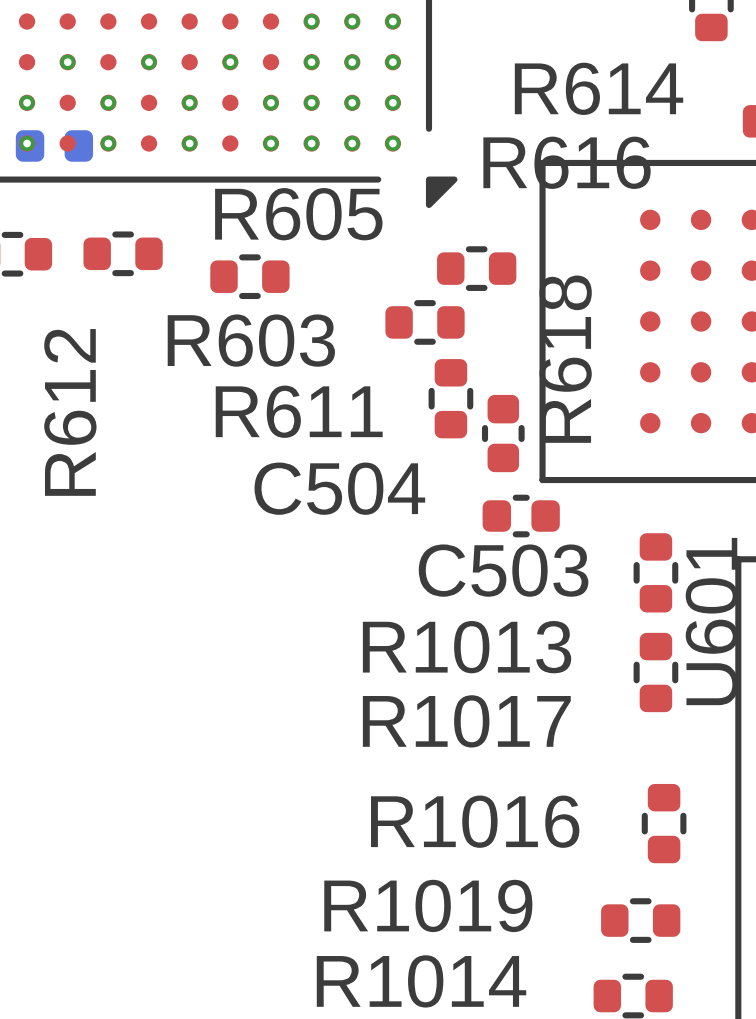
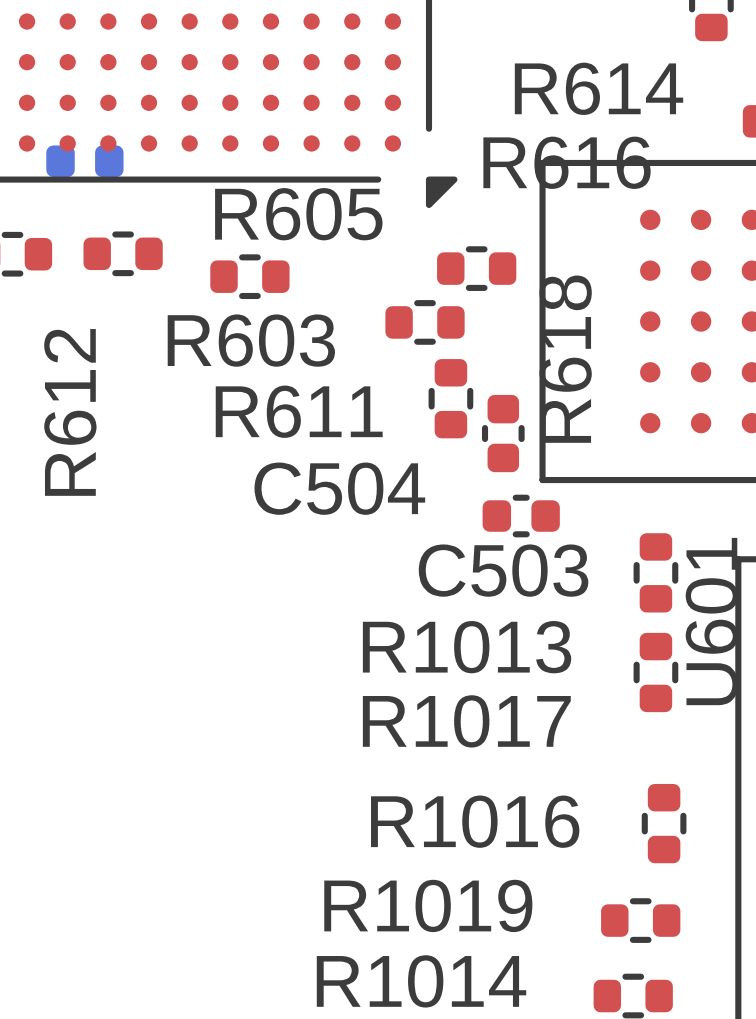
via: (311, 21) -> none
via: (352, 21) -> none
via: (392, 21) -> none
via: (67, 62) -> none
via: (149, 62) -> none
via: (230, 62) -> none
via: (311, 62) -> none
via: (352, 62) -> none
via: (392, 62) -> none
via: (27, 102) -> none
via: (108, 102) -> none
via: (189, 102) -> none
via: (270, 102) -> none
via: (311, 102) -> none
via: (352, 102) -> none
via: (392, 102) -> none
via: (27, 143) -> none
via: (108, 143) -> none
via: (189, 143) -> none
via: (270, 143) -> none
via: (311, 143) -> none
via: (352, 143) -> none
via: (392, 143) -> none
part position: (54, 145) -> (84, 161)

